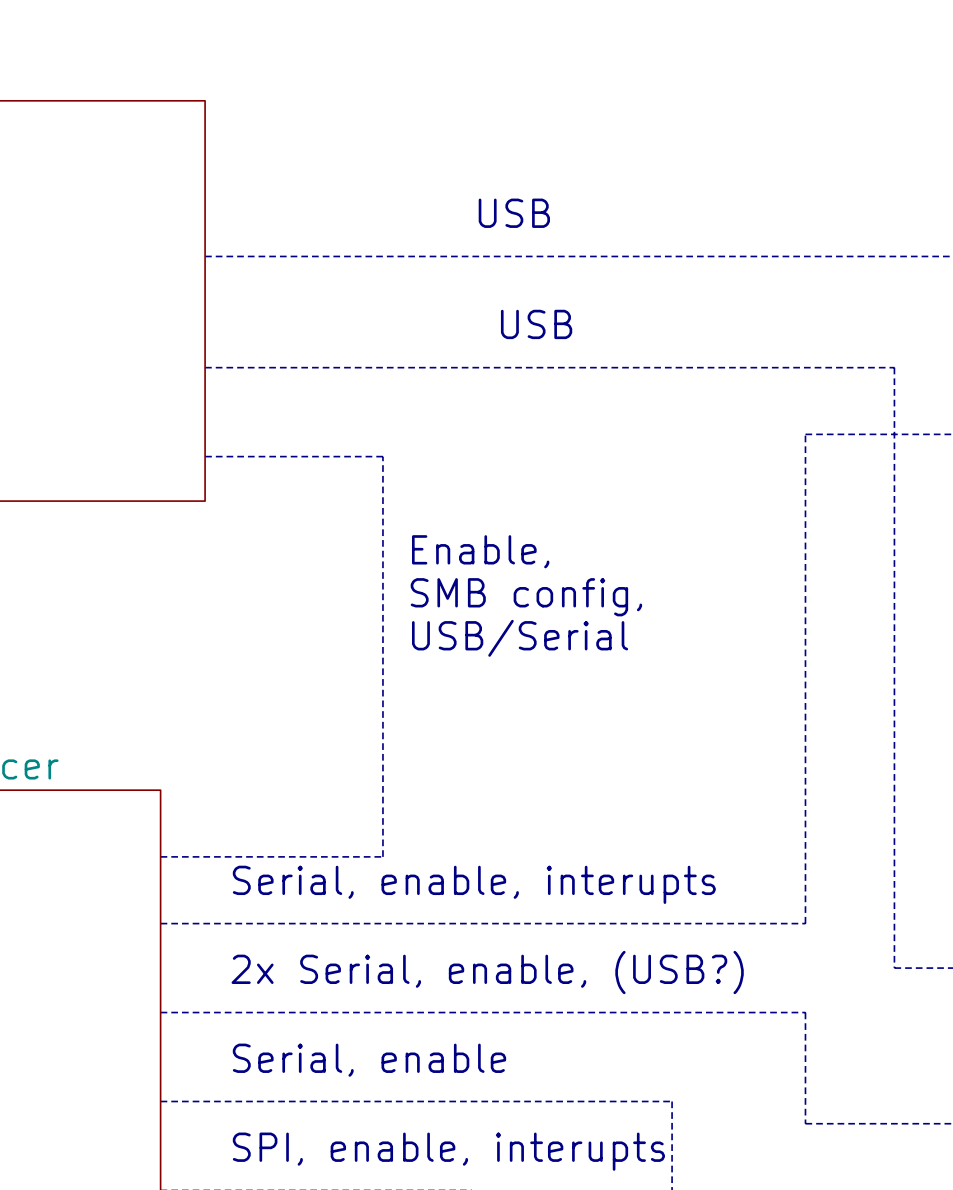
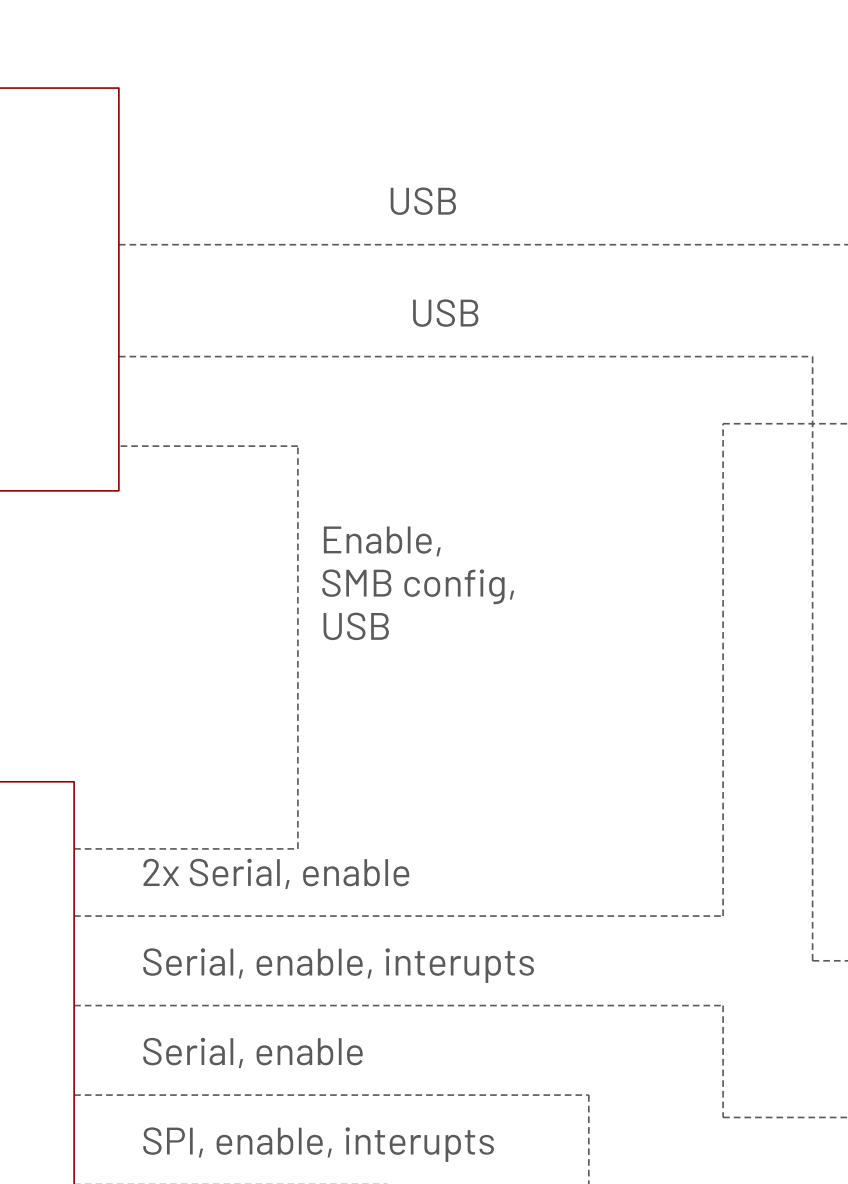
text: USB/Serial (520, 638) -> USB (356, 626)
text: Serial, enable, interupts (474, 884) -> 2x Serial, enable (276, 873)
text: 2x Serial, enable, (USB?) (487, 972) -> Serial, enable, interupts (338, 965)

